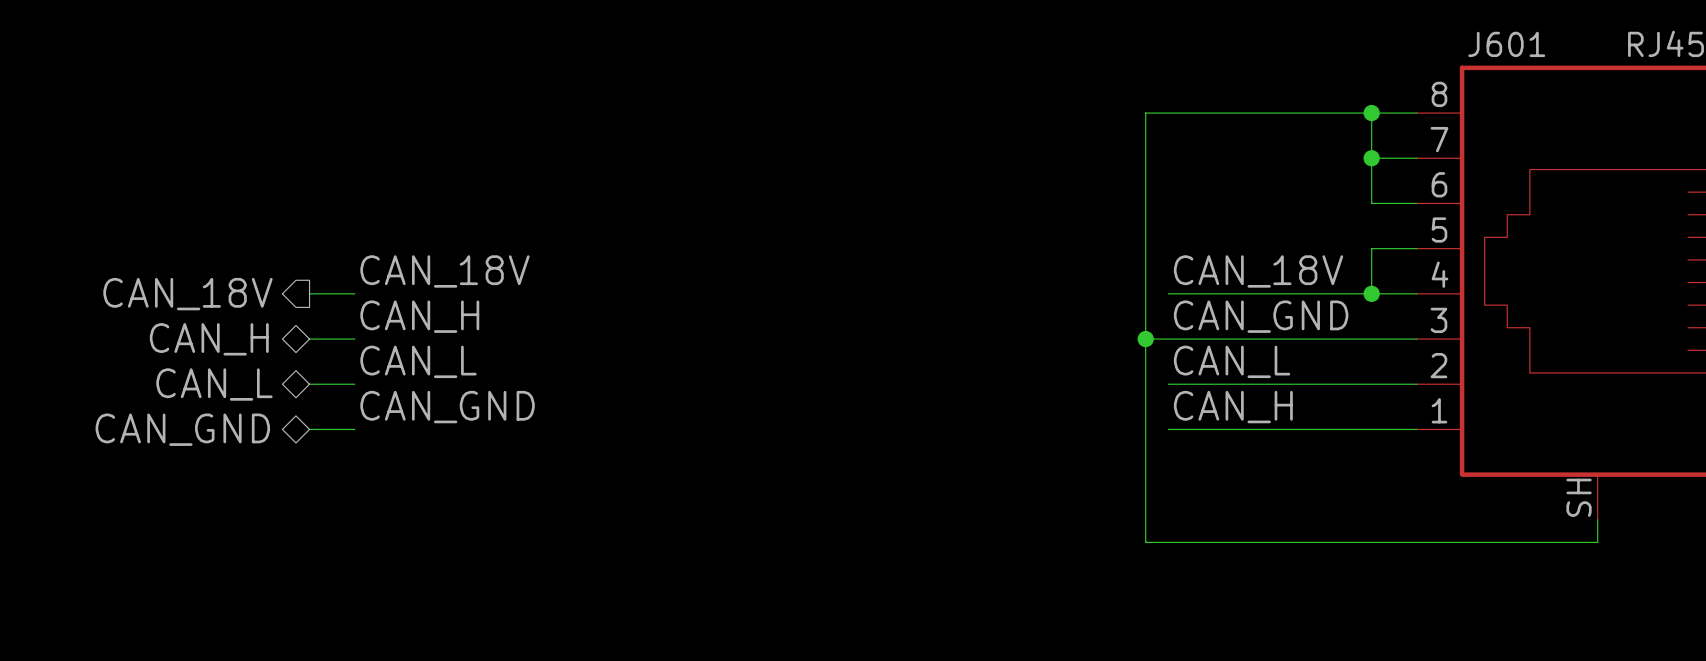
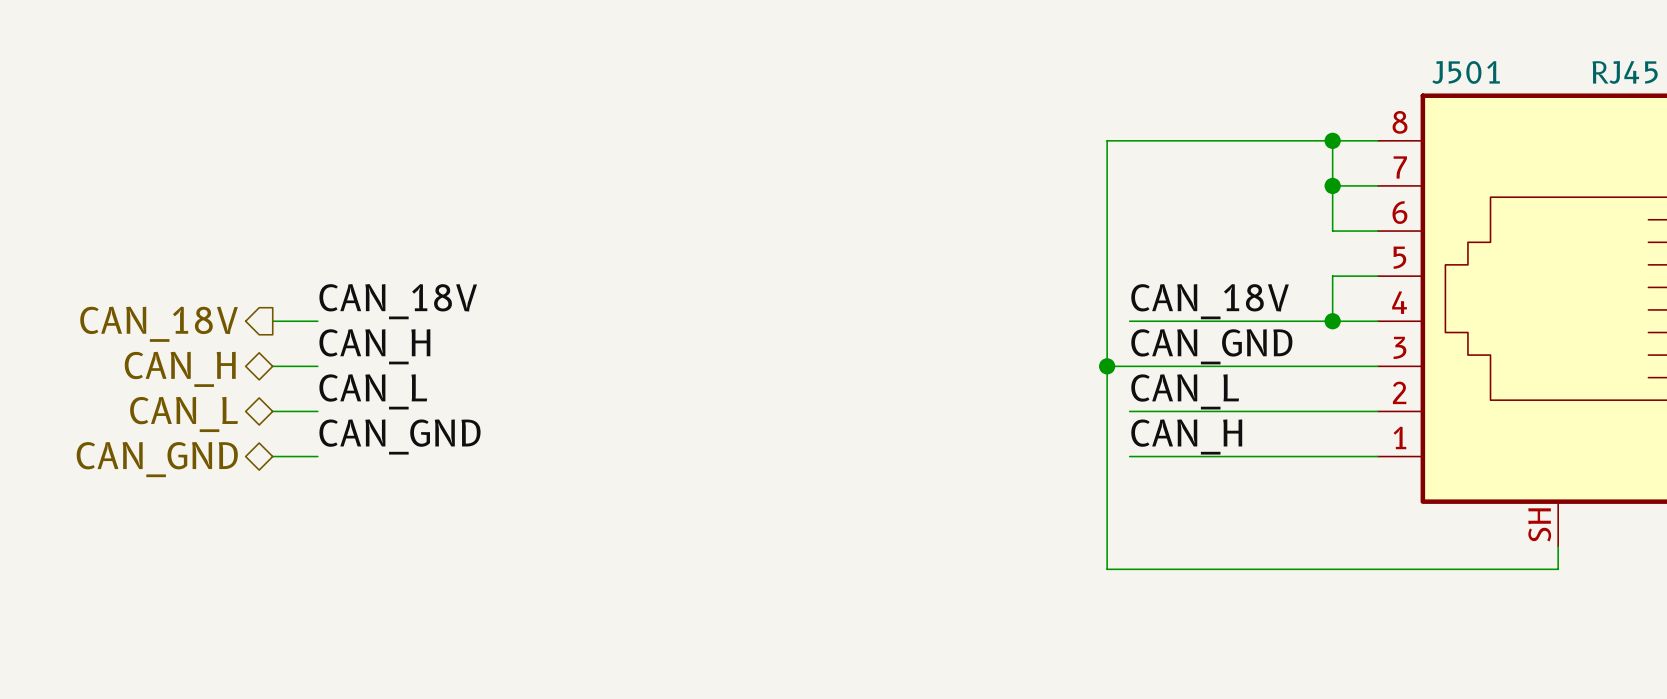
J601 name: J601 (1506, 44) -> J501 (1466, 72)

